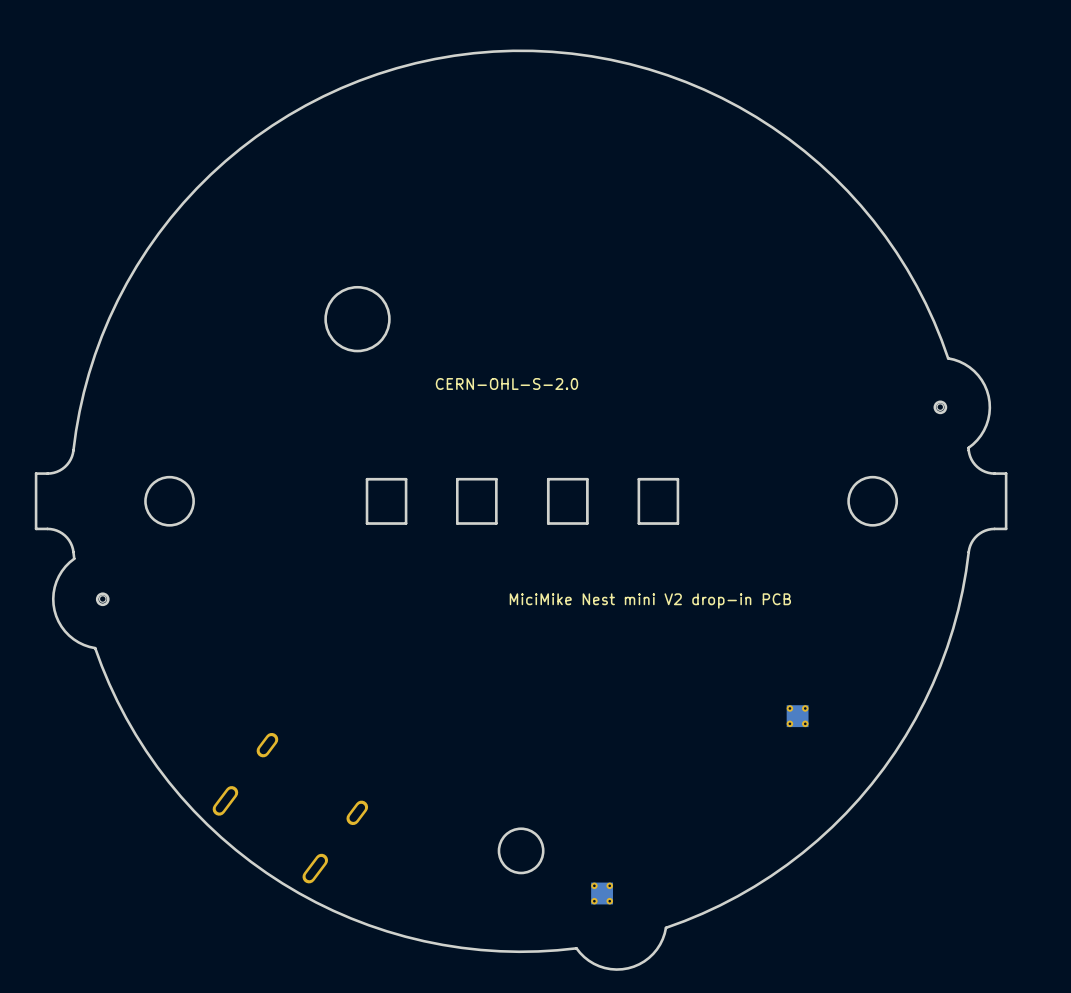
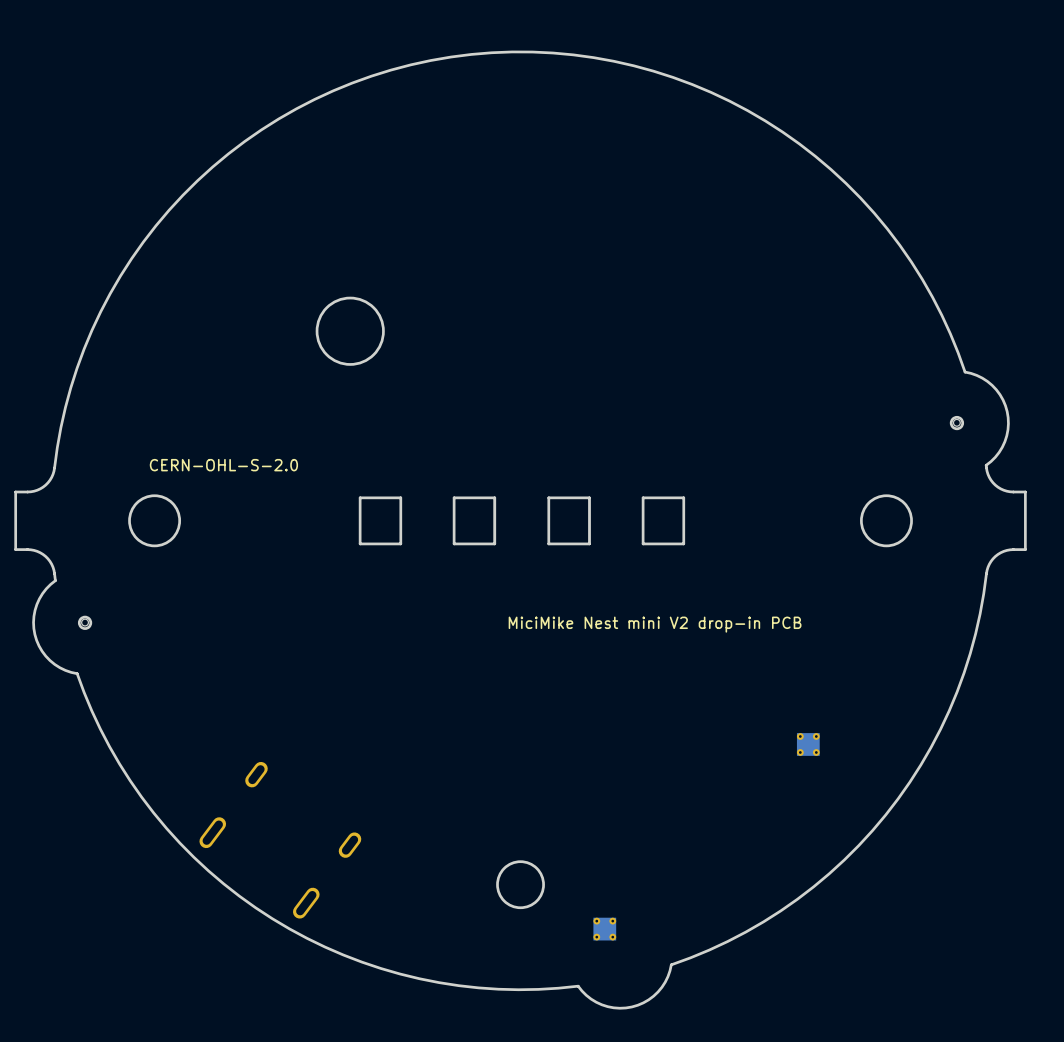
text position: CERN-OHL-S-2.0 (506, 383) -> CERN-OHL-S-2.0 (223, 465)

